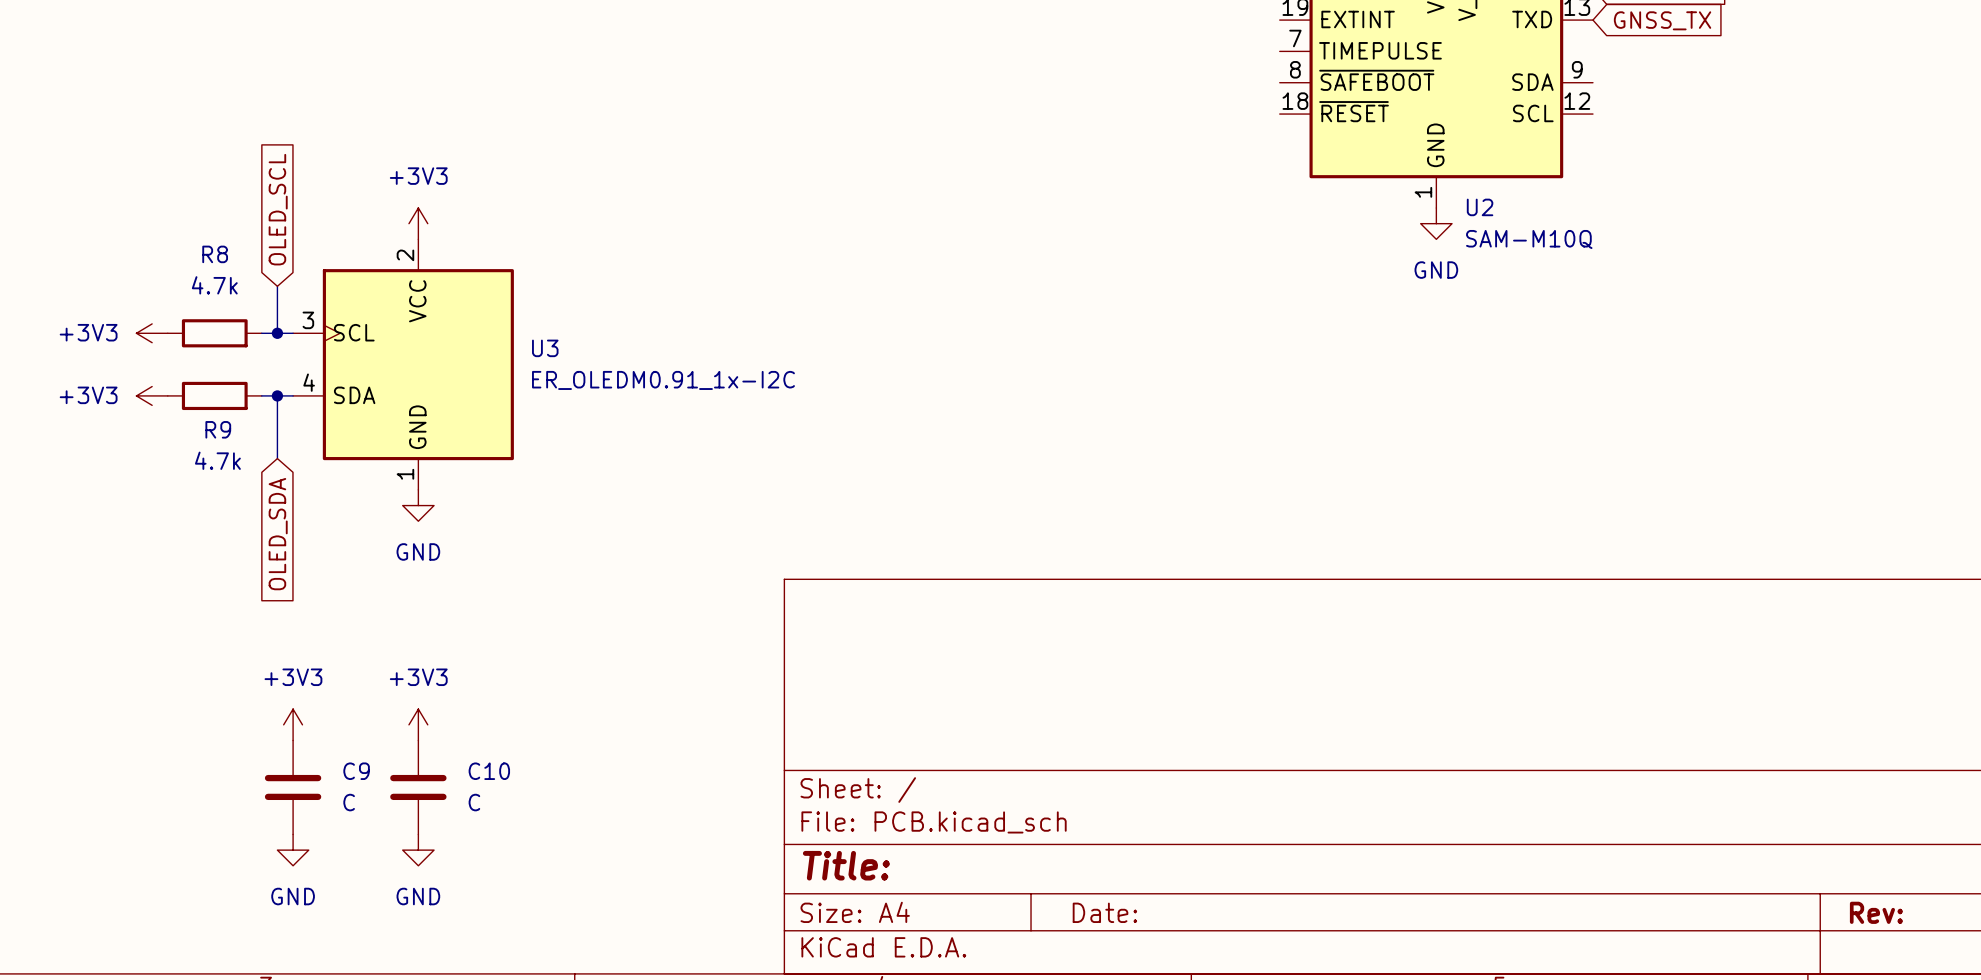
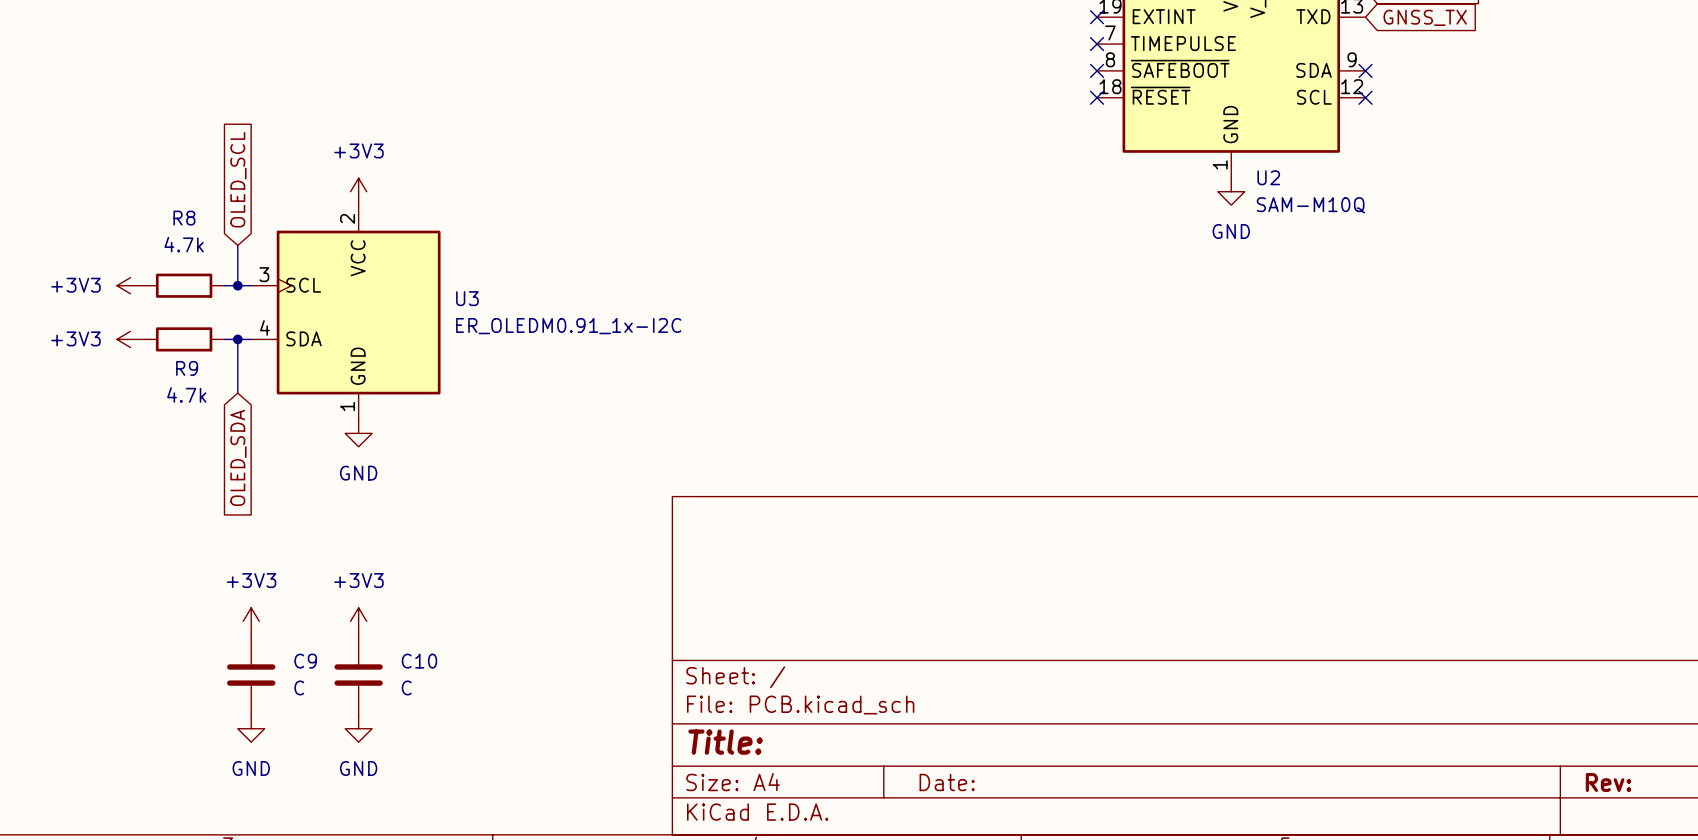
no-connect mark: none -> (1097, 17)
no-connect mark: none -> (1097, 44)
no-connect mark: none -> (1097, 70)
no-connect mark: none -> (1365, 70)
no-connect mark: none -> (1097, 97)
no-connect mark: none -> (1365, 97)

